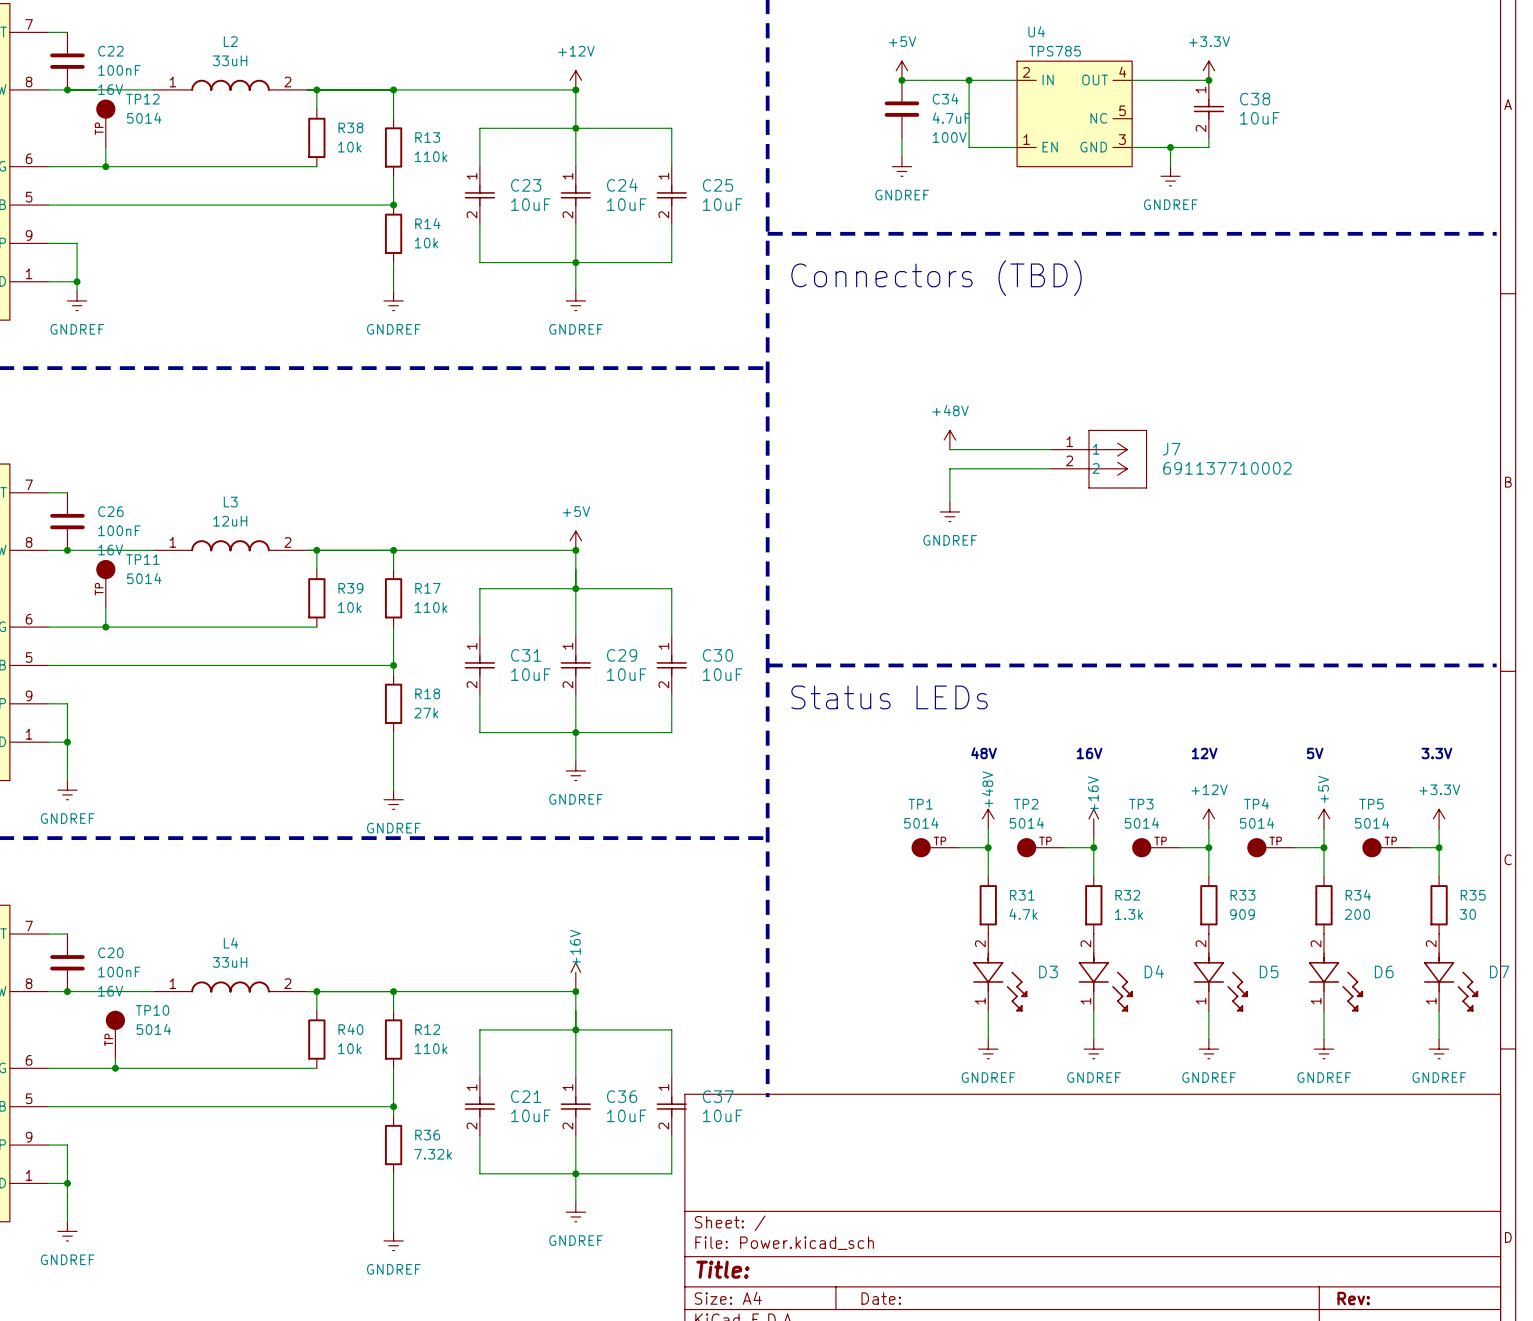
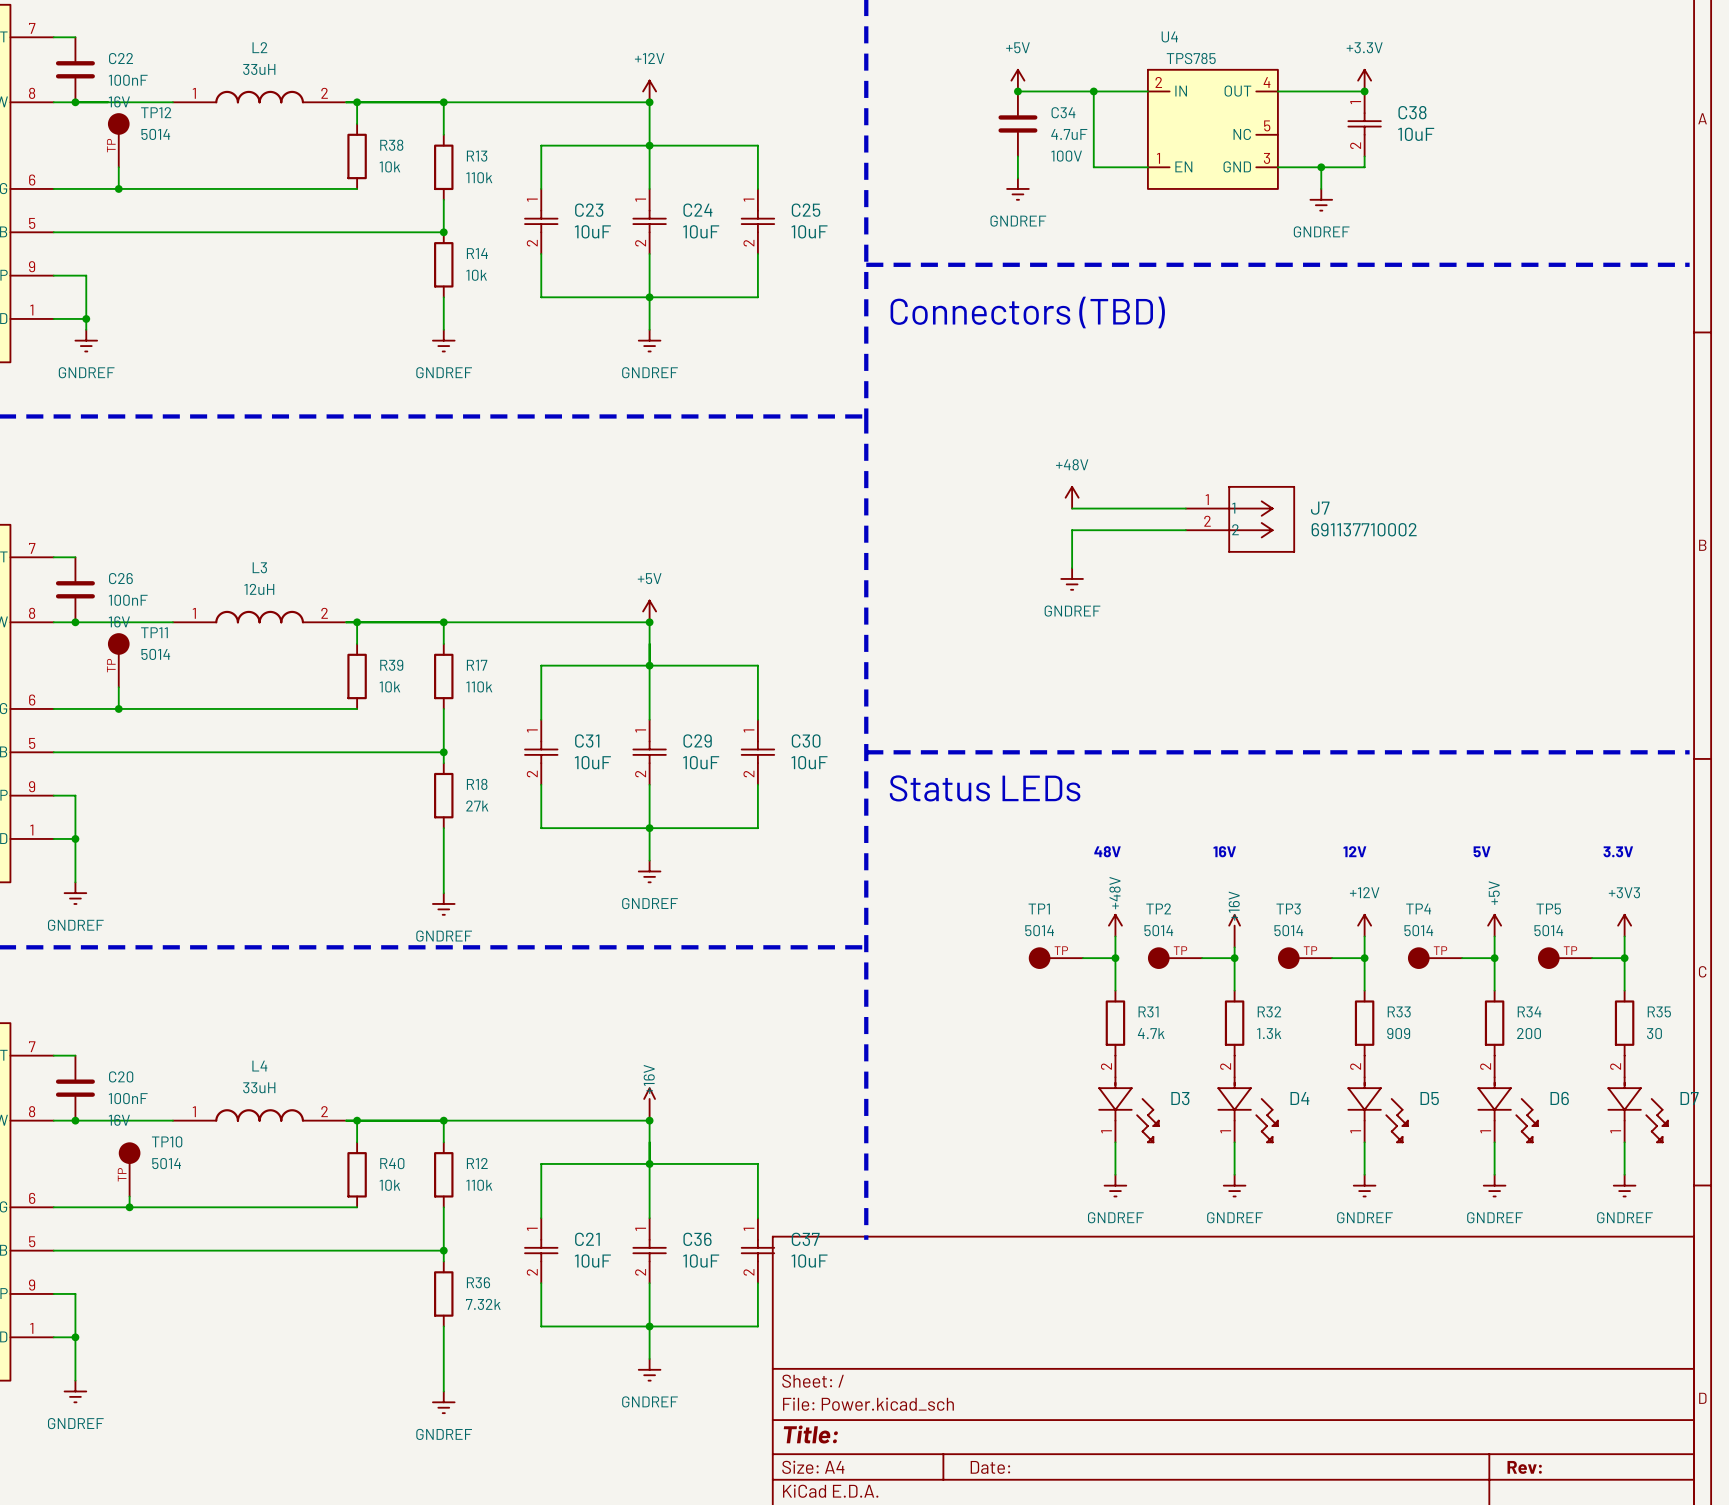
power symbol: +3.3V (1439, 818) -> +3V3 (1624, 925)

